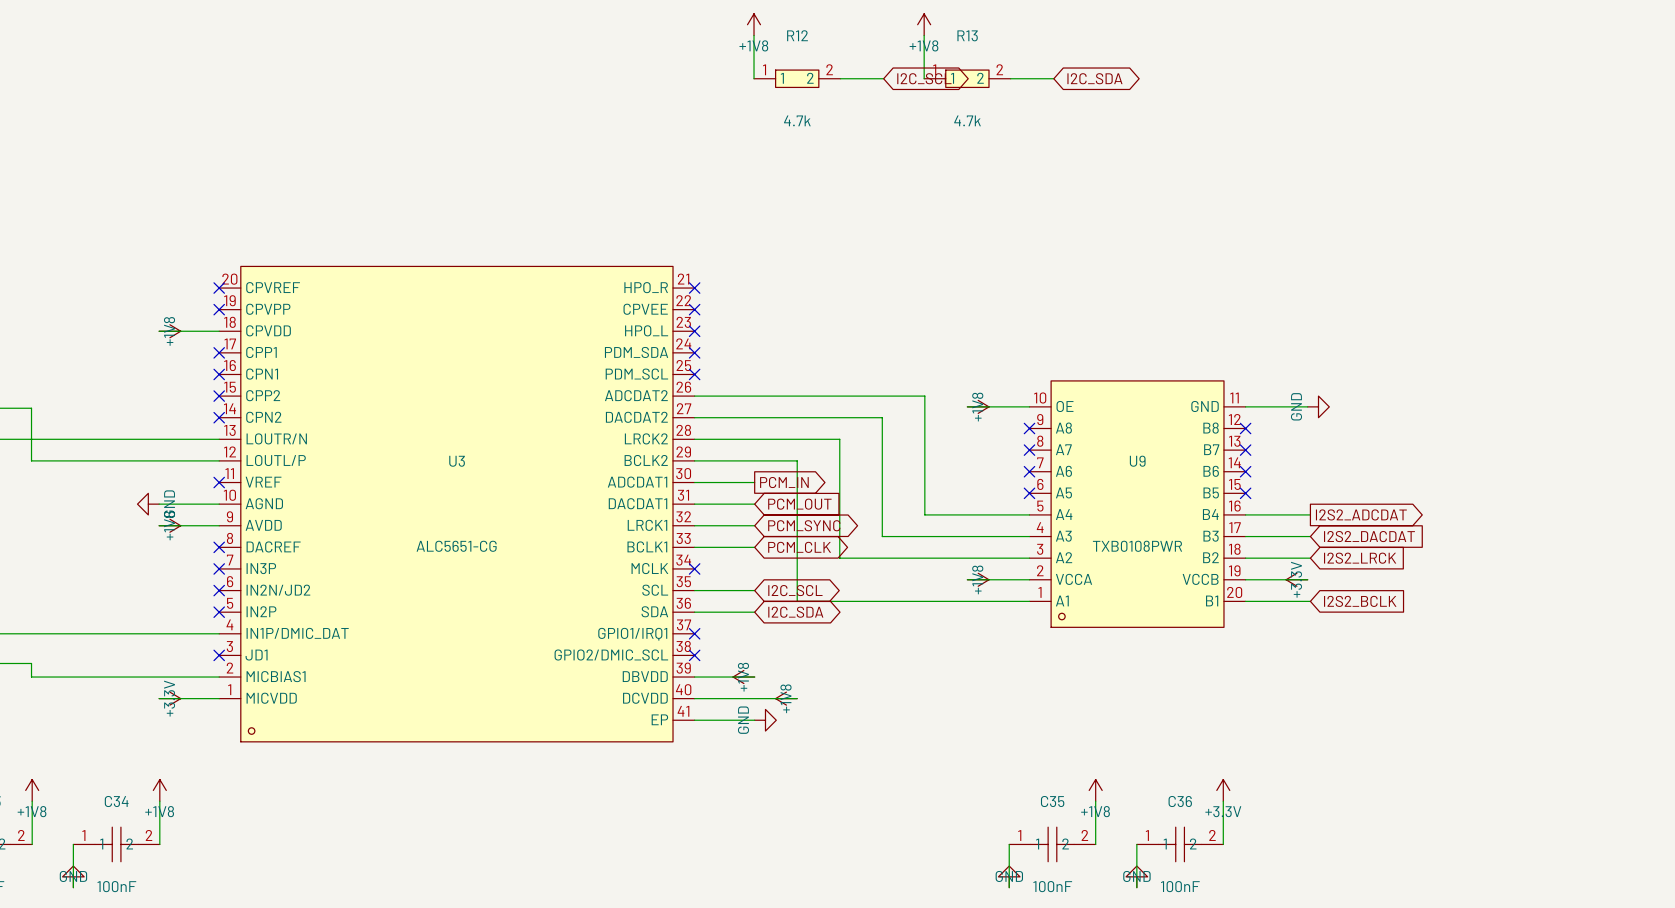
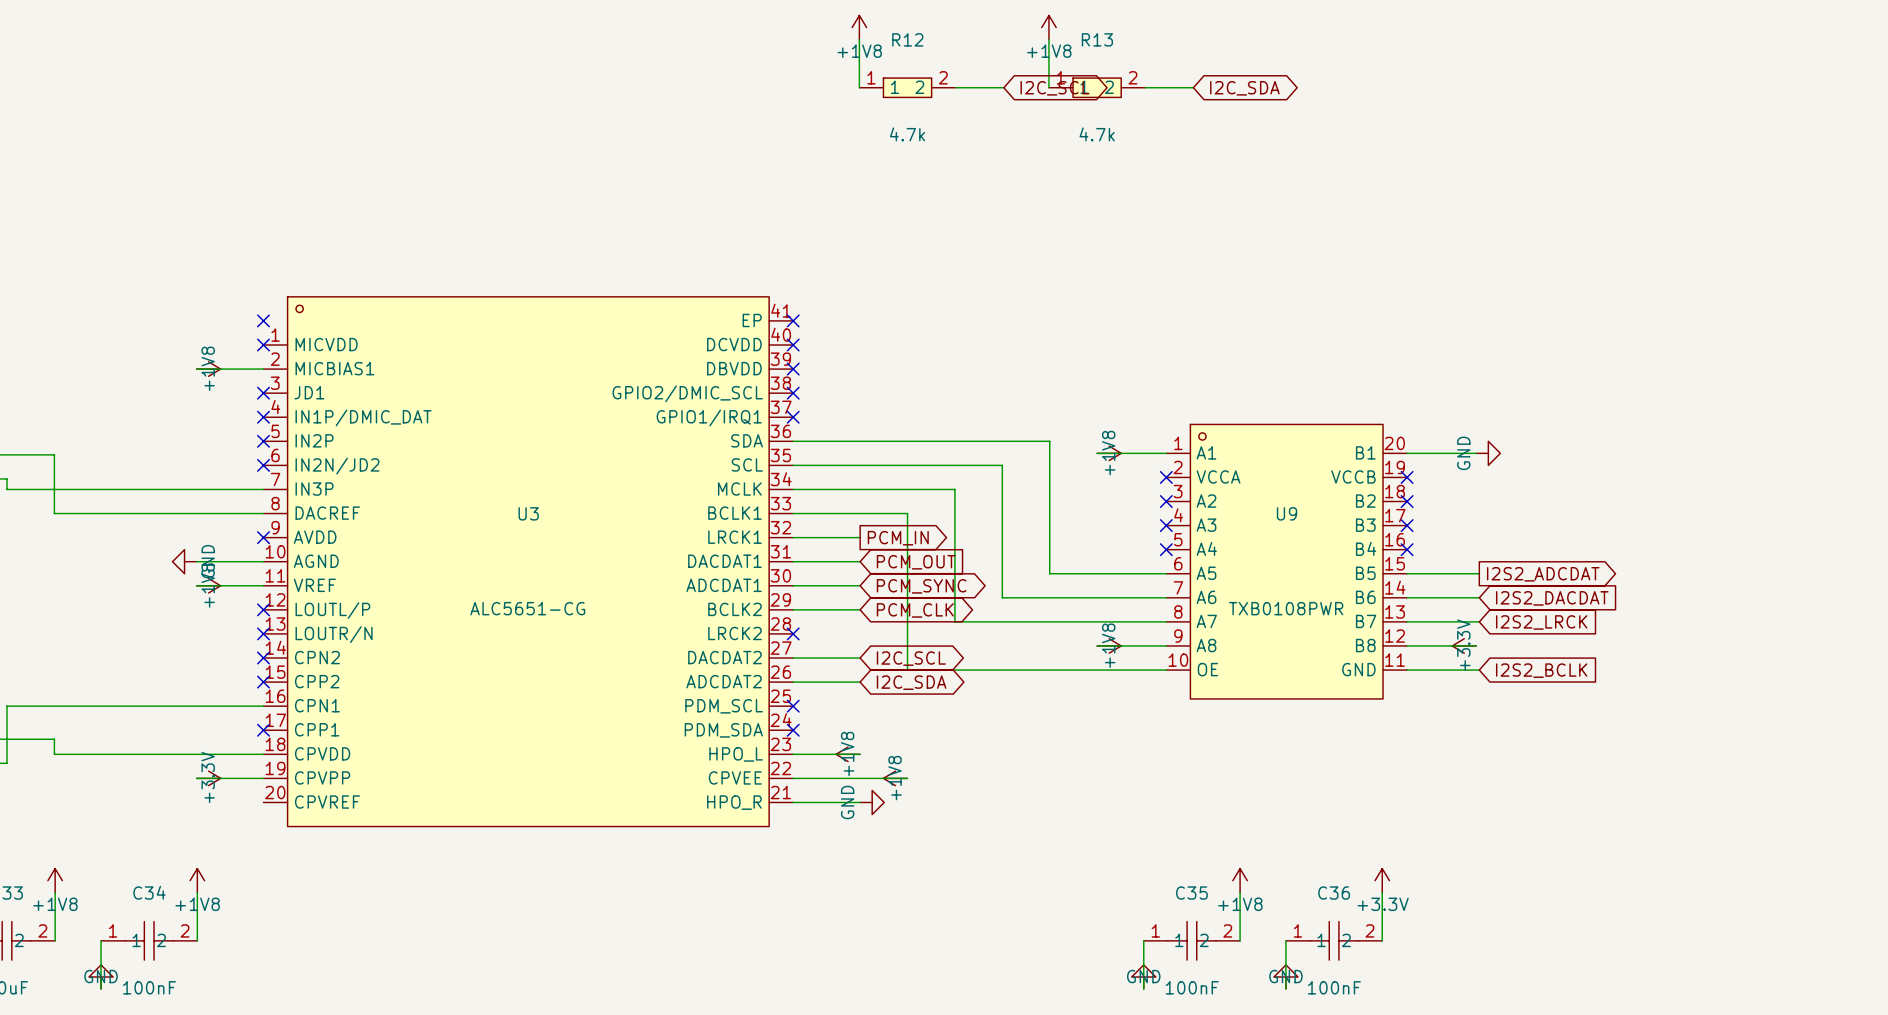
U3 flip: as is (456, 504) -> up-down (528, 561)
U9 flip: as is (1137, 504) -> up-down (1286, 561)

